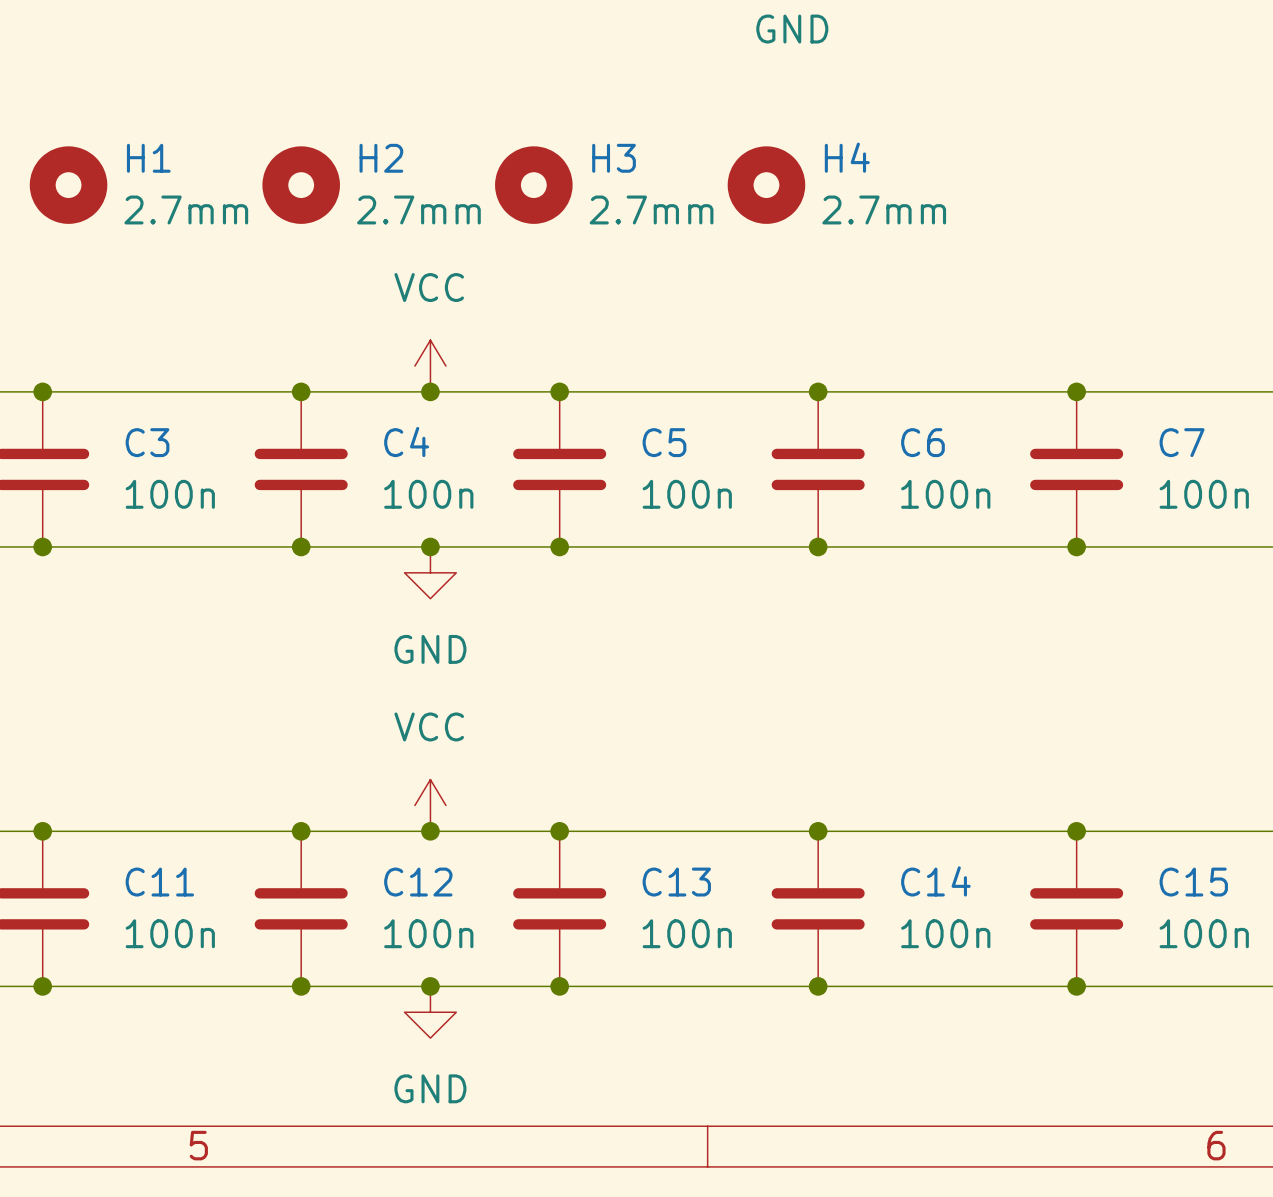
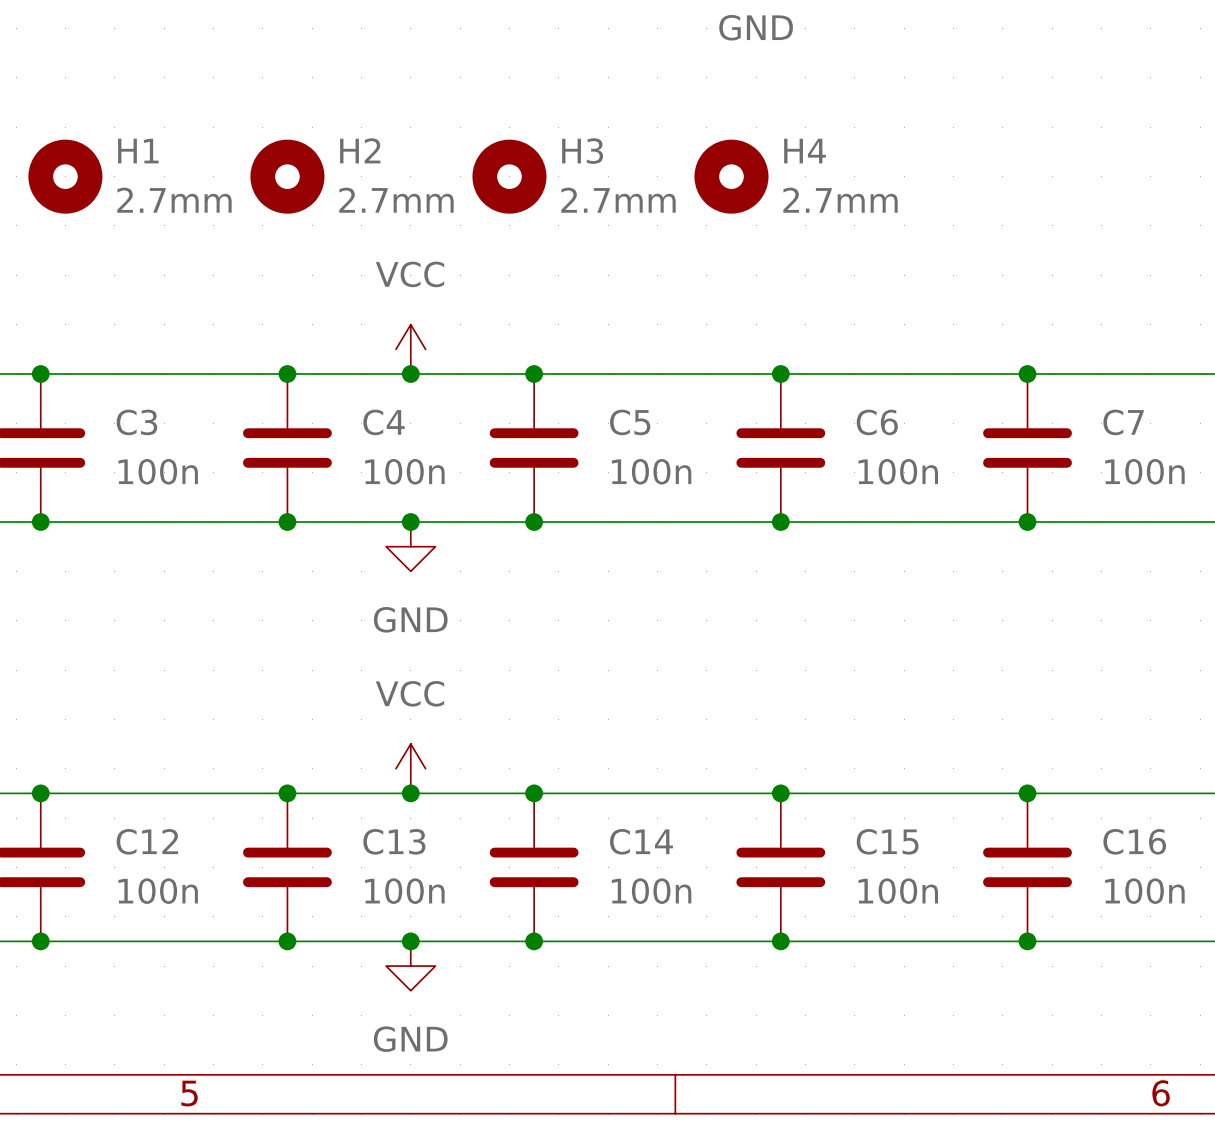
C14 name: C14 (935, 881) -> C15 (887, 841)
C11 name: C11 (159, 882) -> C12 (147, 841)
C12 name: C12 (418, 882) -> C13 (394, 841)
C13 name: C13 (676, 882) -> C14 (641, 841)
C15 name: C15 (1193, 882) -> C16 (1134, 841)

